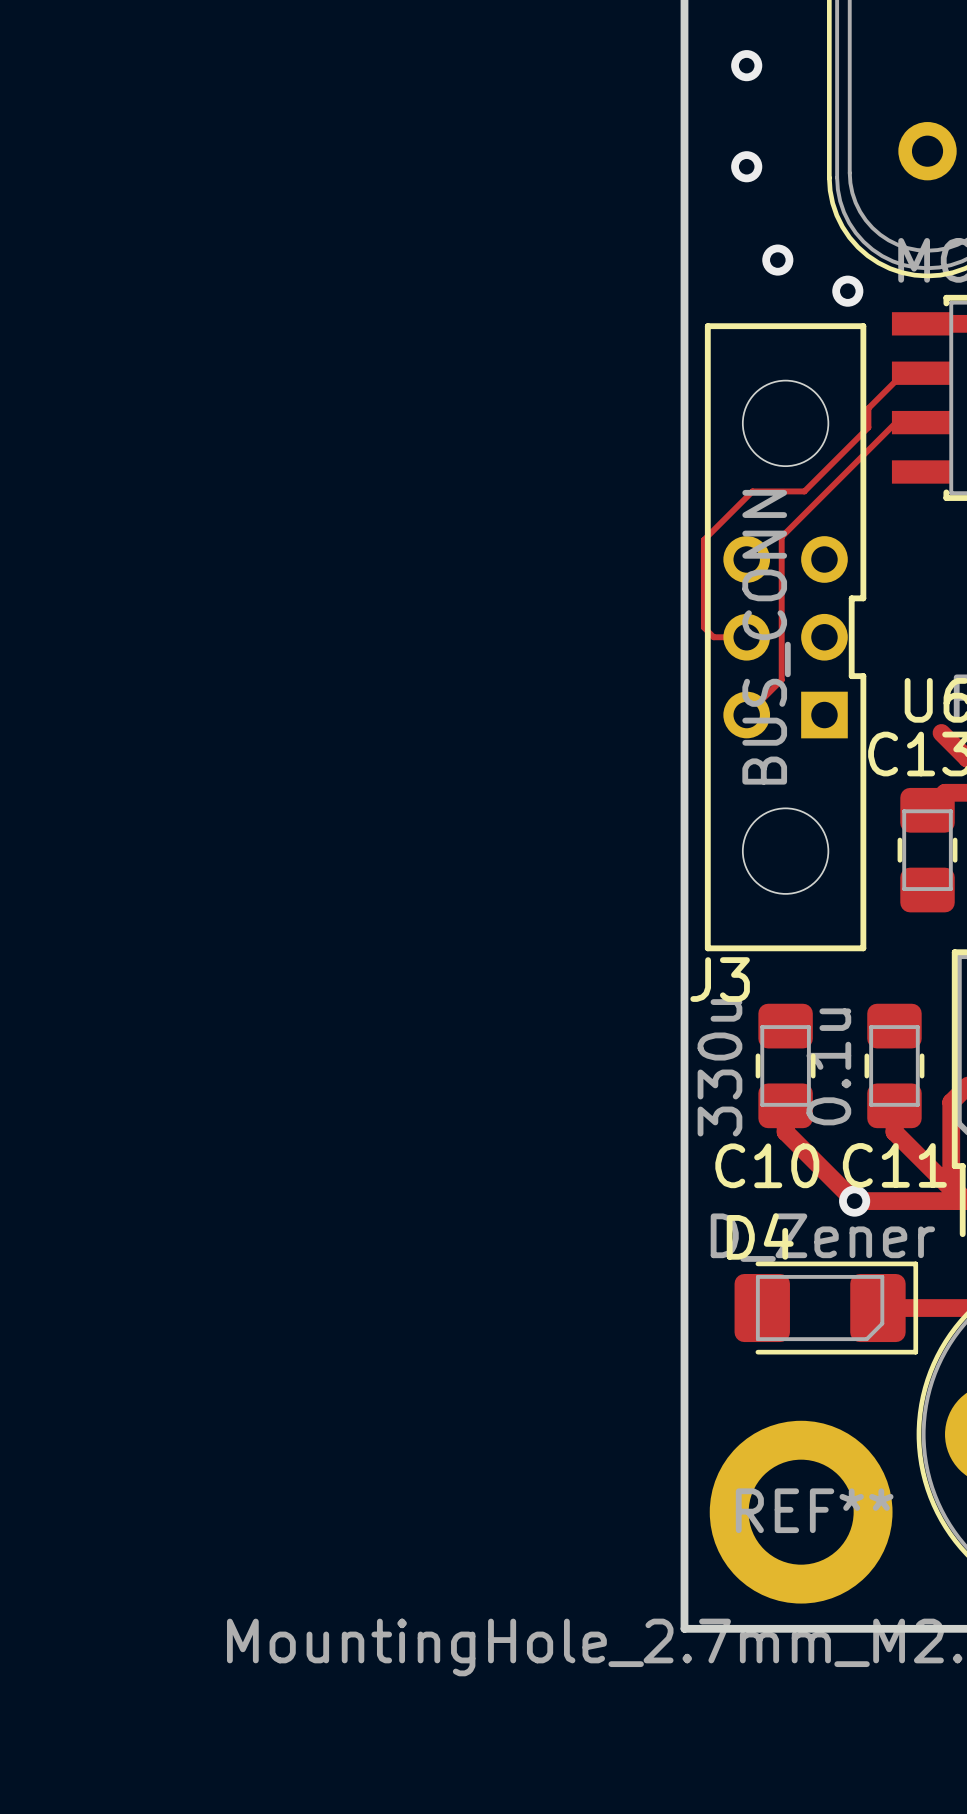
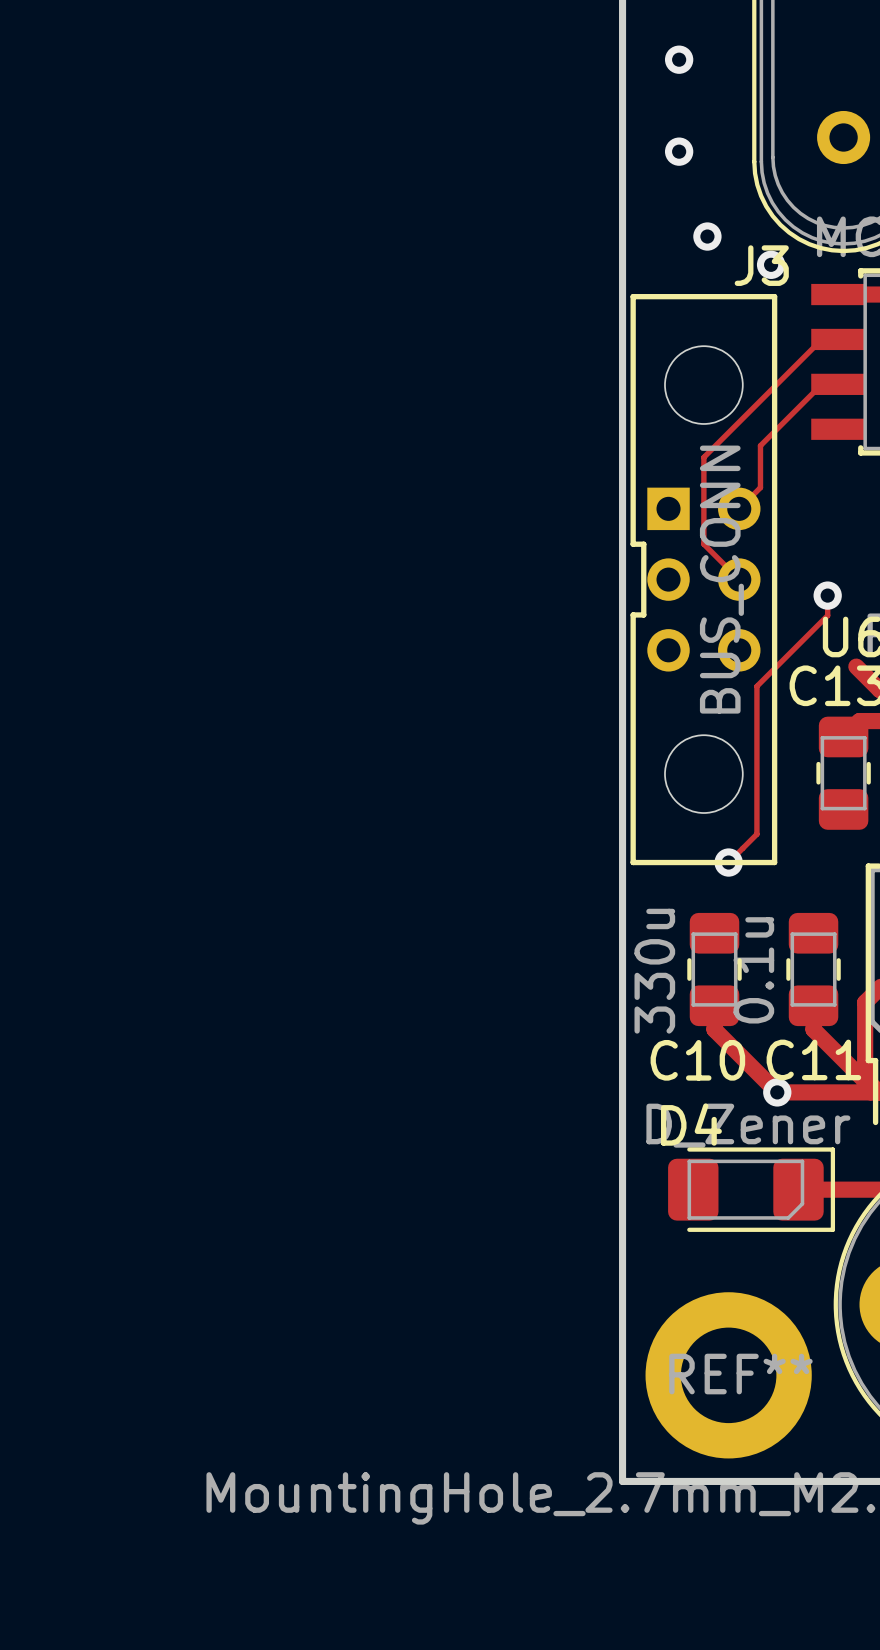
track: (868, 408) (868, 427) (804, 491) (752, 491) (703, 540) (703, 627) (713, 637) (746, 637) -> (789, 371) (703, 457) (703, 544) (739, 579)
track: (896, 422) (781, 536) (781, 680) (746, 715) -> none
track: none -> (821, 384) (760, 445) (760, 487) (739, 508)
J3 rotation: 0° (785, 637) -> 180° (703, 579)
track: none -> (827, 595) (827, 615) (756, 686) (756, 834) (728, 862)
via: none -> (827, 595)
via: none -> (728, 862)

